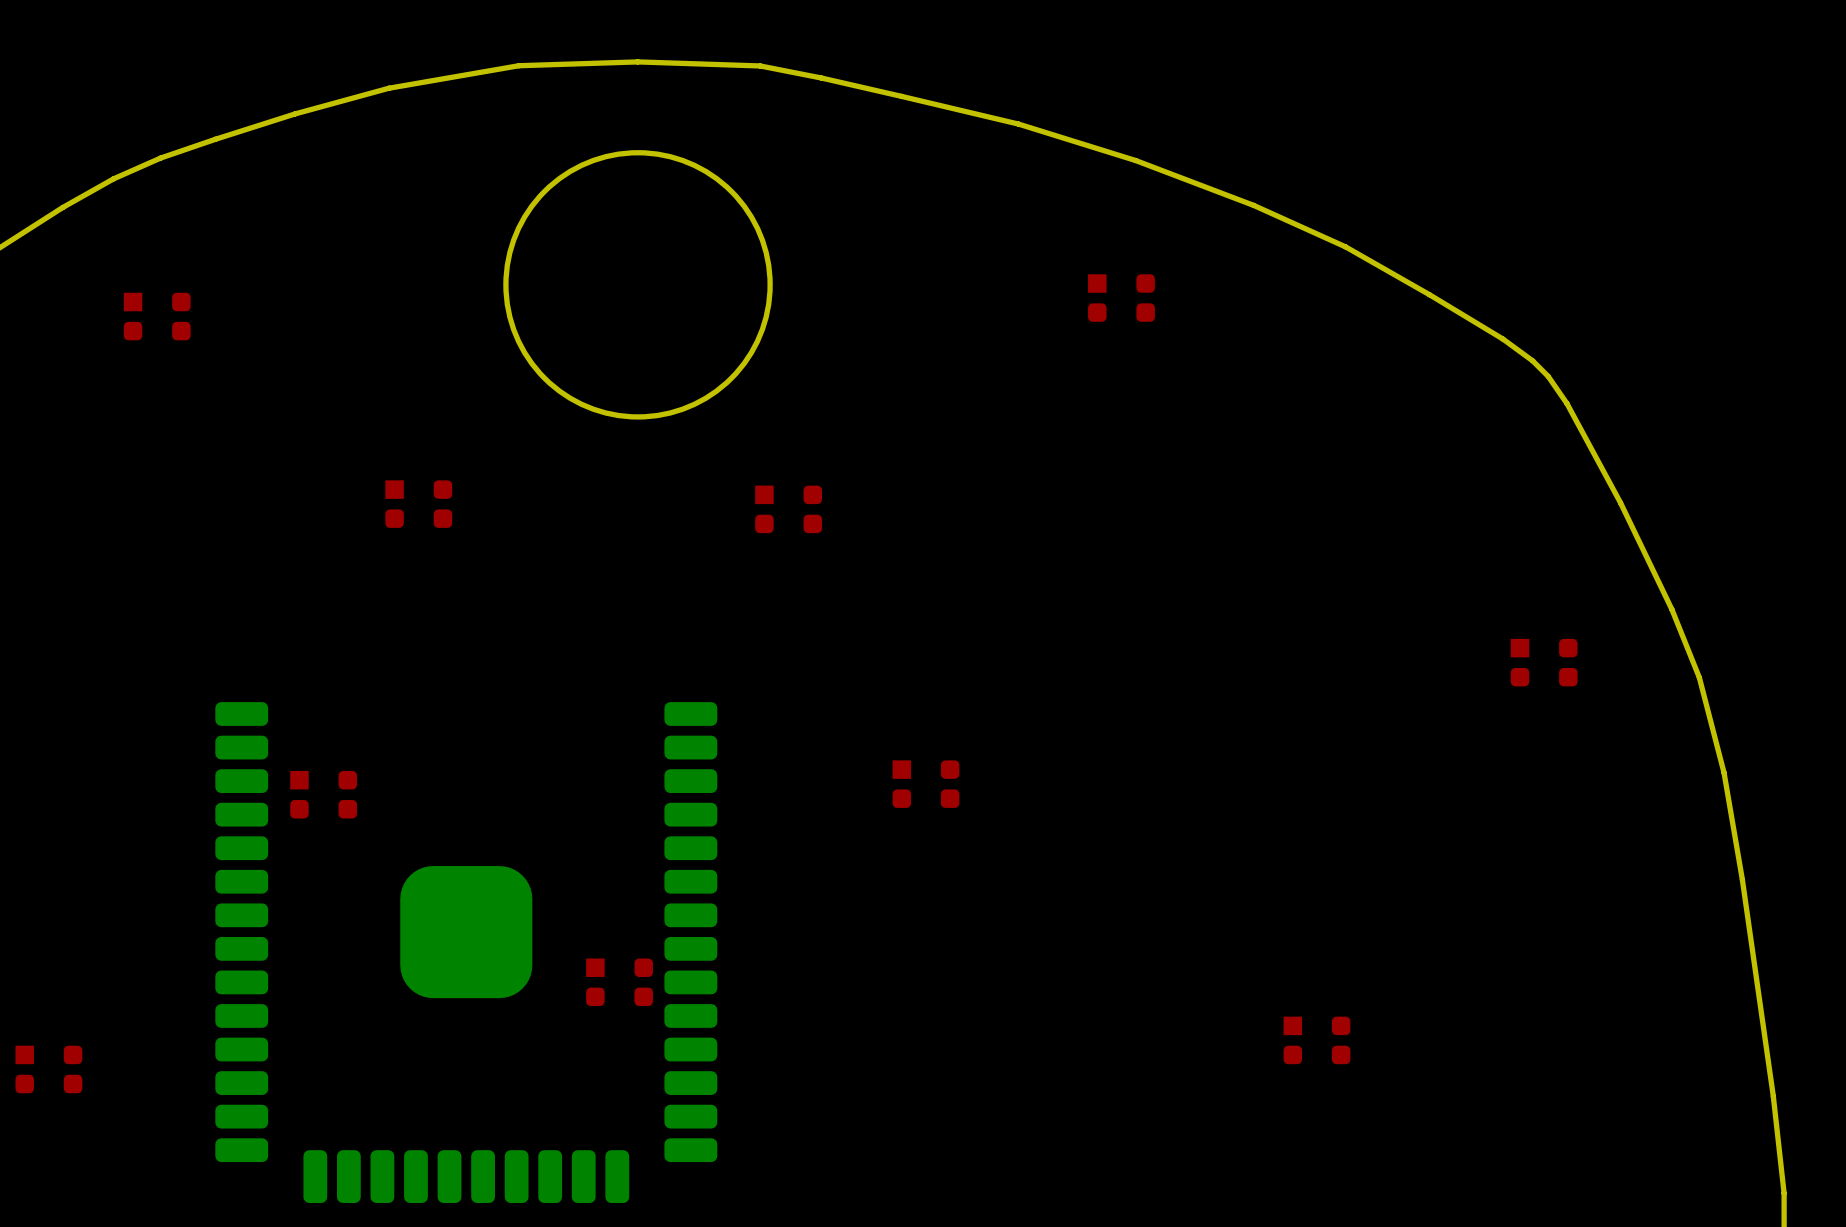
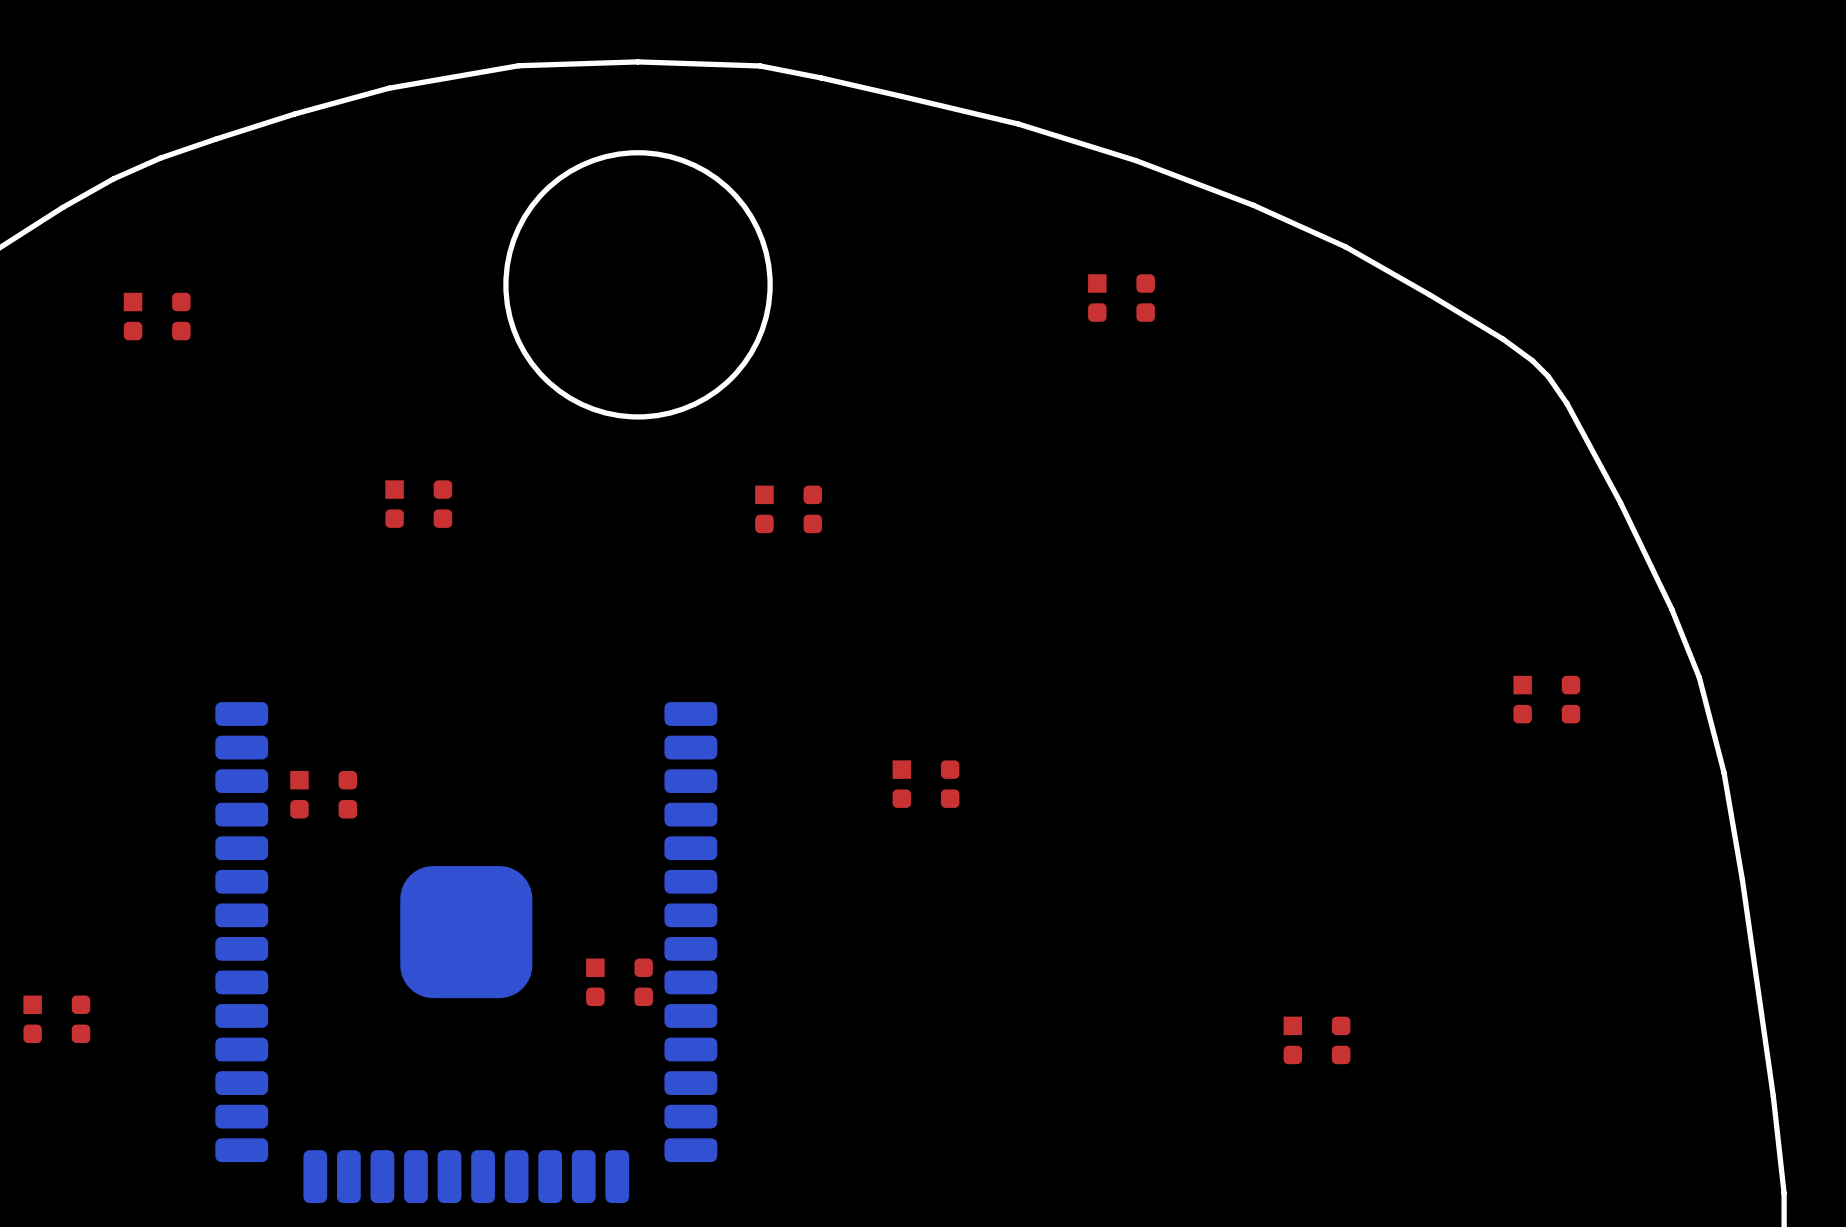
part position: (1544, 662) -> (1546, 699)
part position: (48, 1069) -> (56, 1019)

